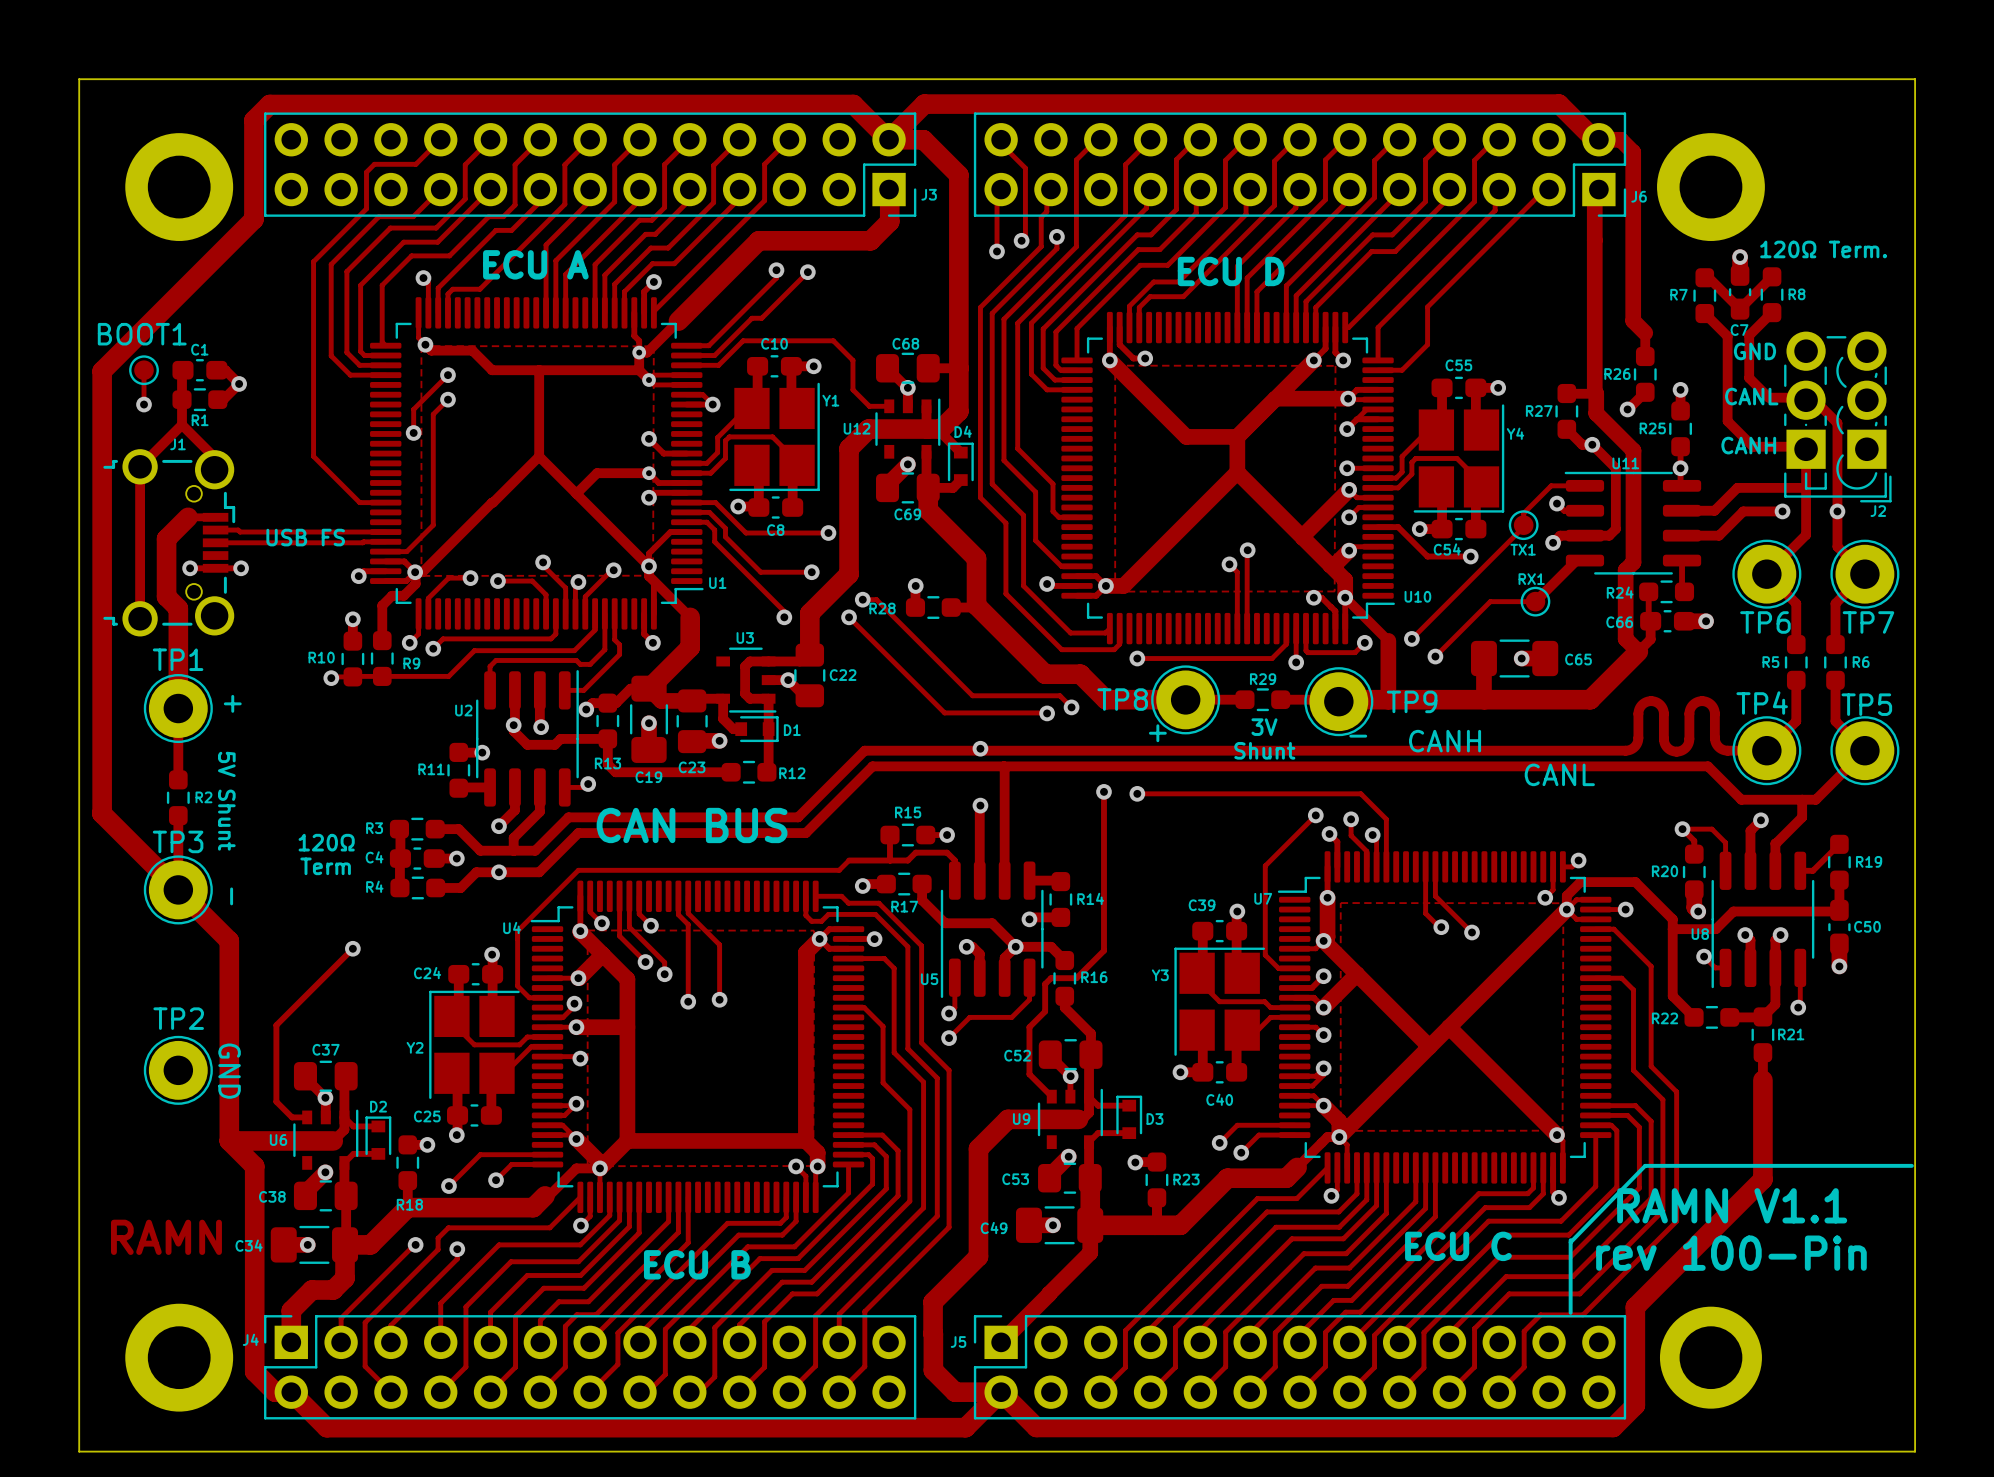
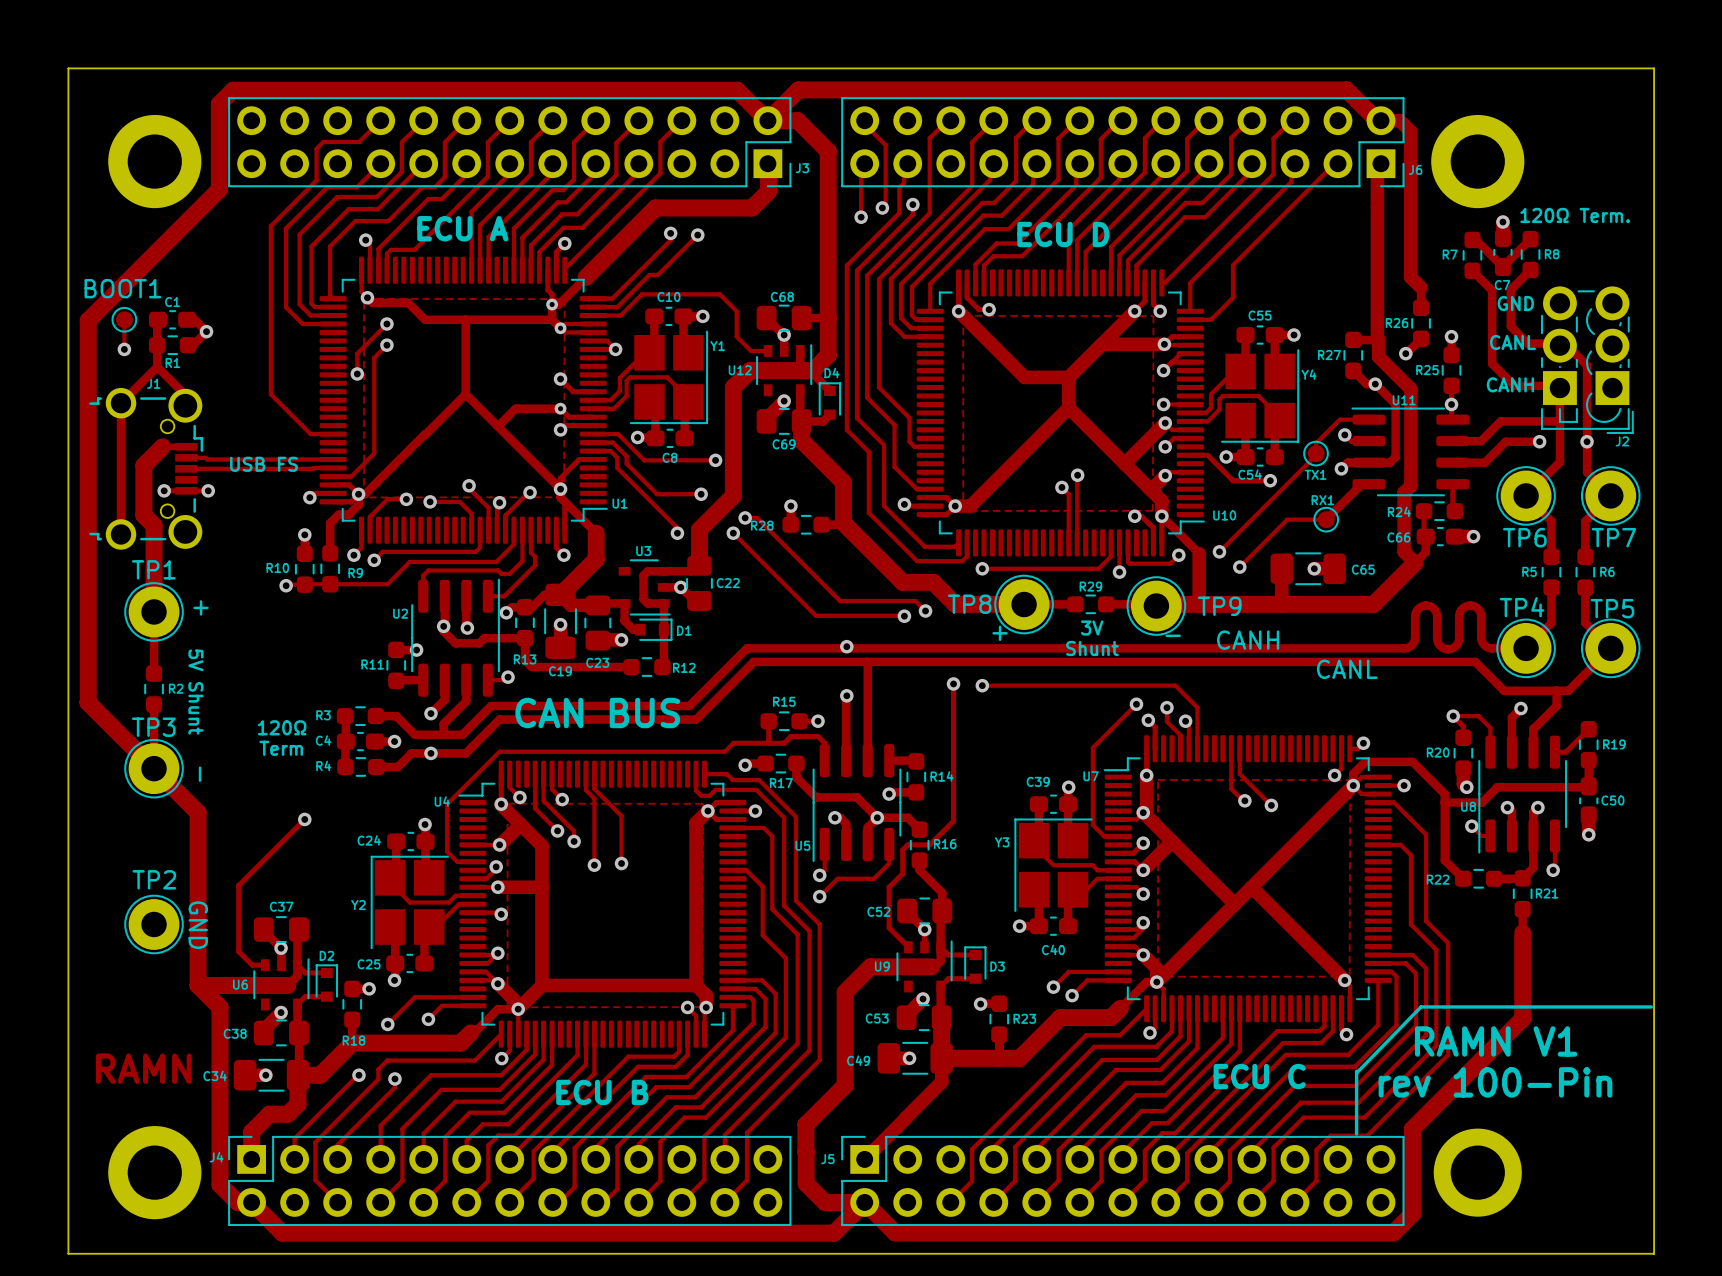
text: RAMN V1.1 (1732, 1205) -> RAMN V1 (1496, 1041)

